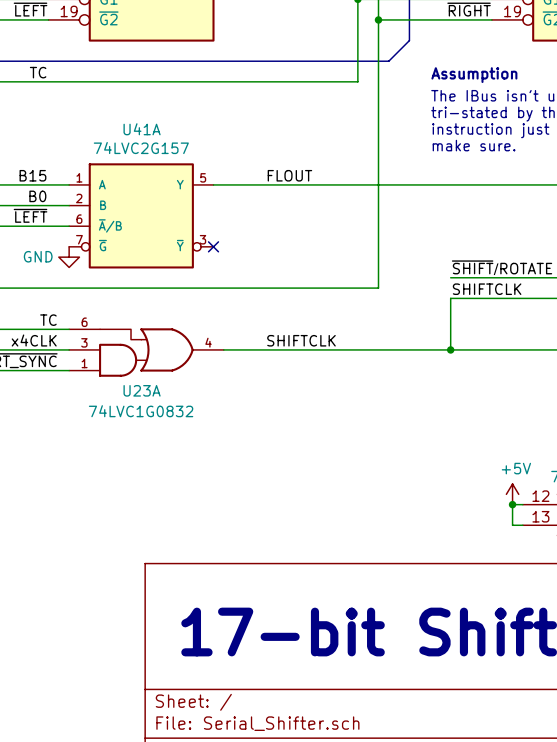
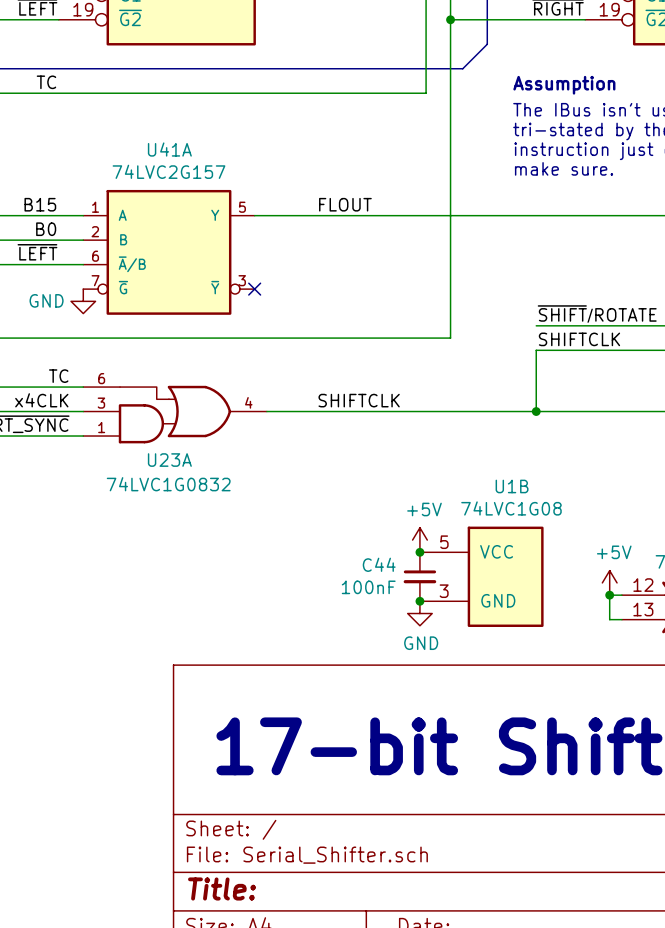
power symbol: none -> +5V (419, 540)
junction: none -> (419, 552)
C44: none -> 100nF (419, 576)
U1B: none -> 74LVC1G08 (481, 576)
junction: none -> (419, 601)
power symbol: none -> GND (419, 613)

